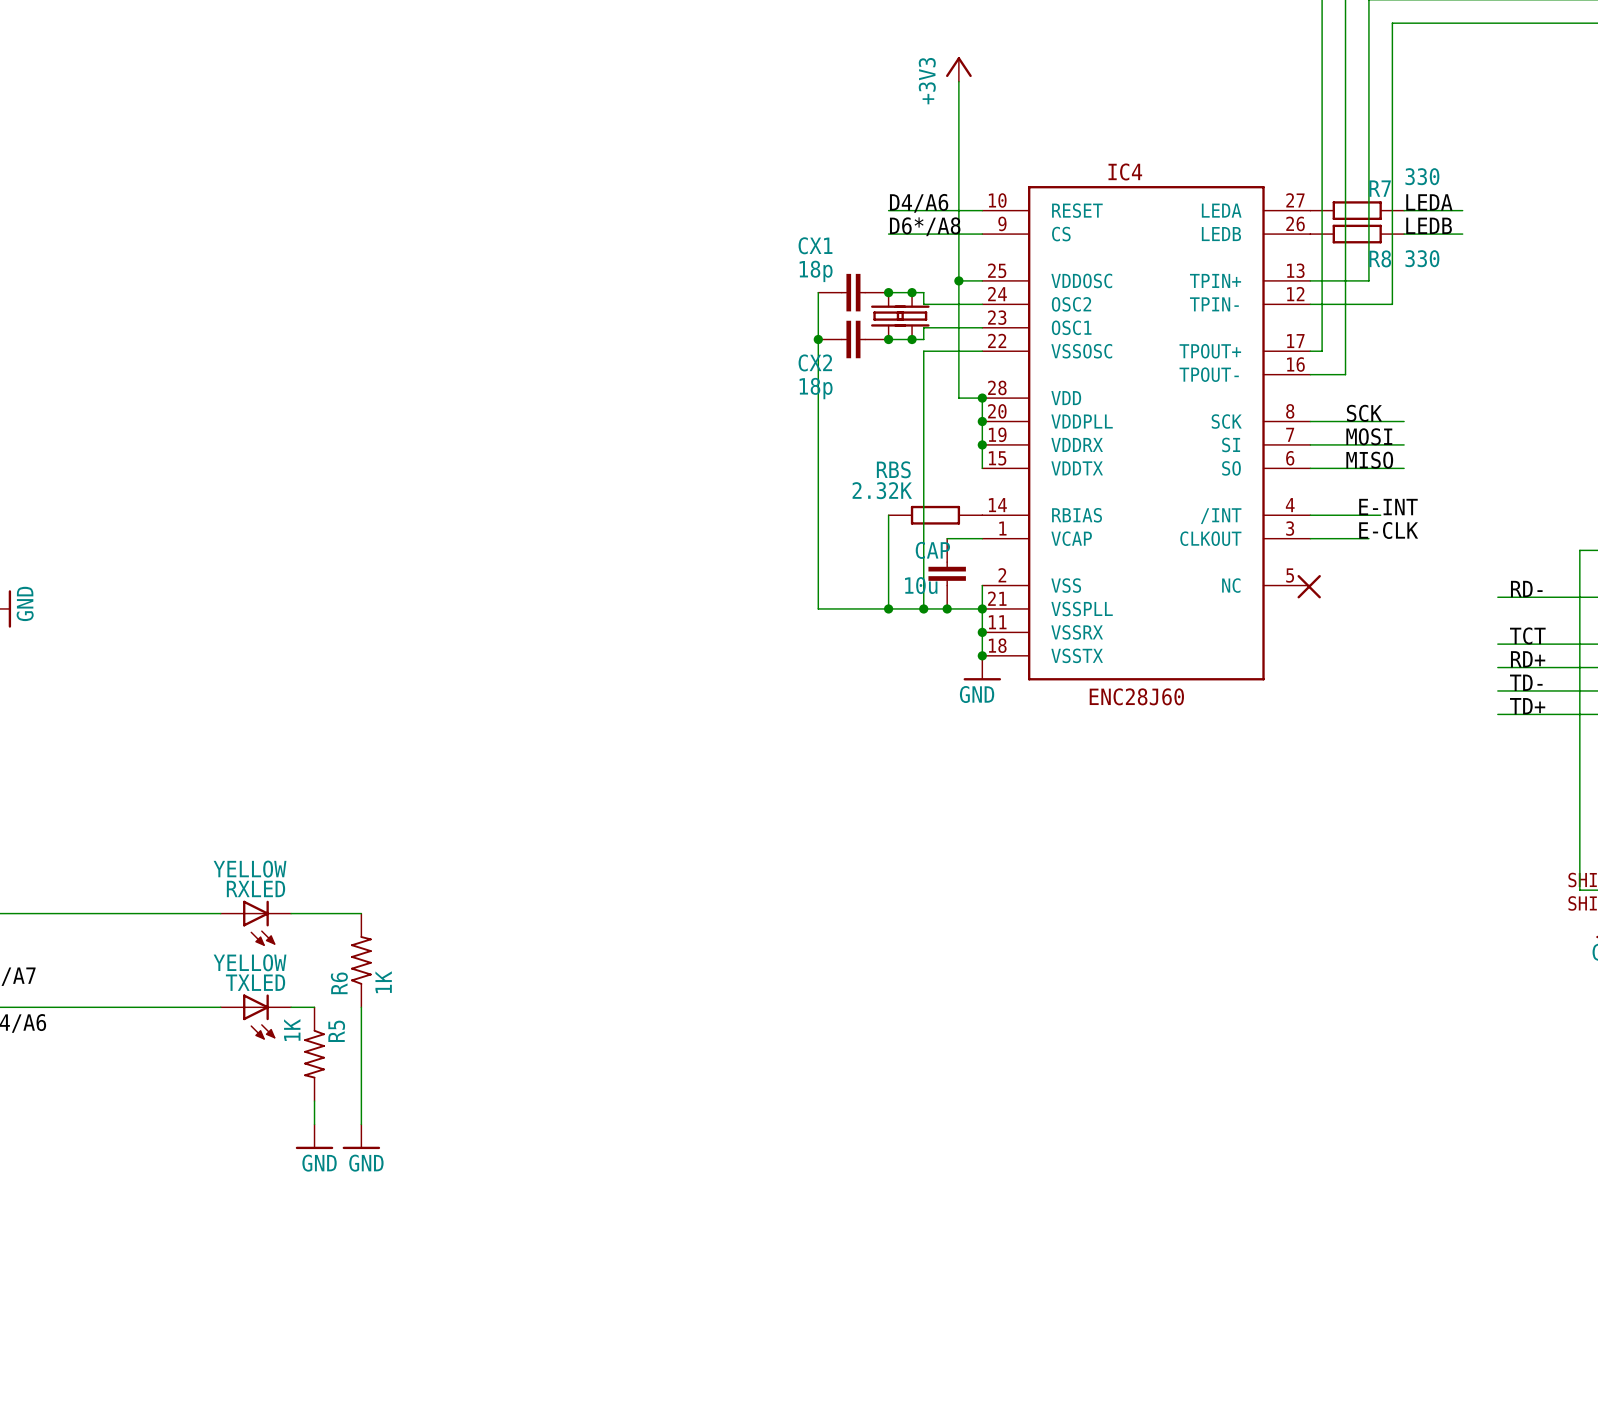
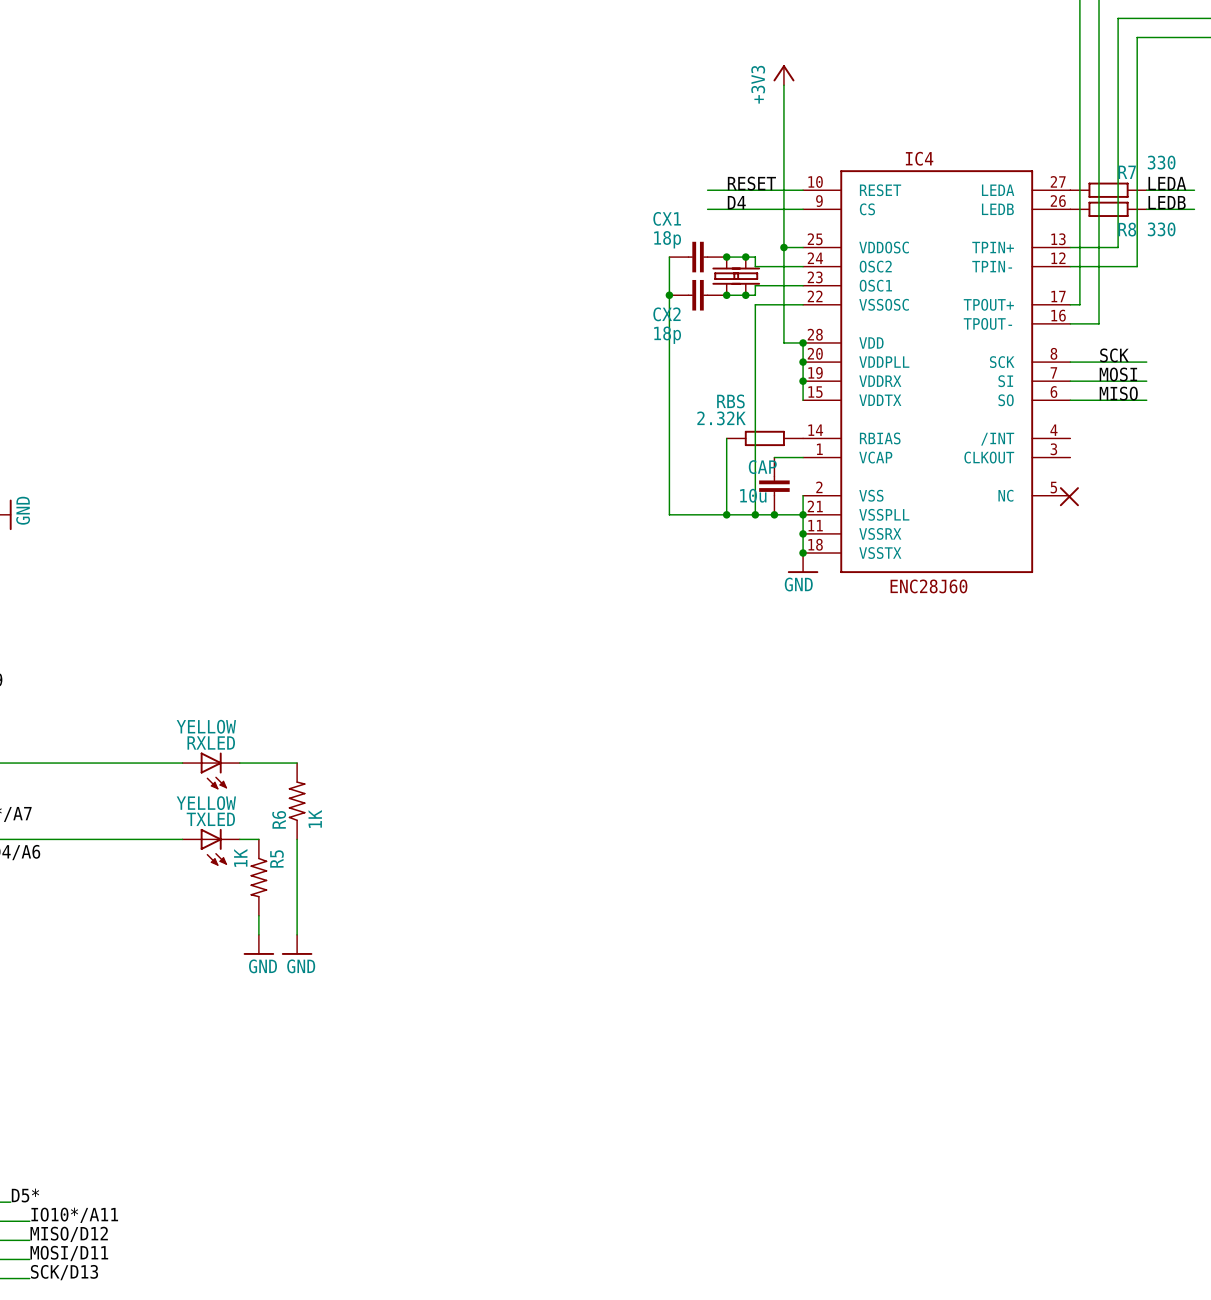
label: D4/A6 (919, 203) -> RESET (751, 183)
wire: none -> (707, 190) (726, 190)
label: D6*/A8 (925, 226) -> D4 (736, 202)
wire: none -> (707, 209) (726, 209)
label: E-INT (1388, 507) -> none
wire: (1310, 515) (1380, 515) -> none
label: E-CLK (1388, 530) -> none
wire: (1310, 538) (1368, 538) -> none

